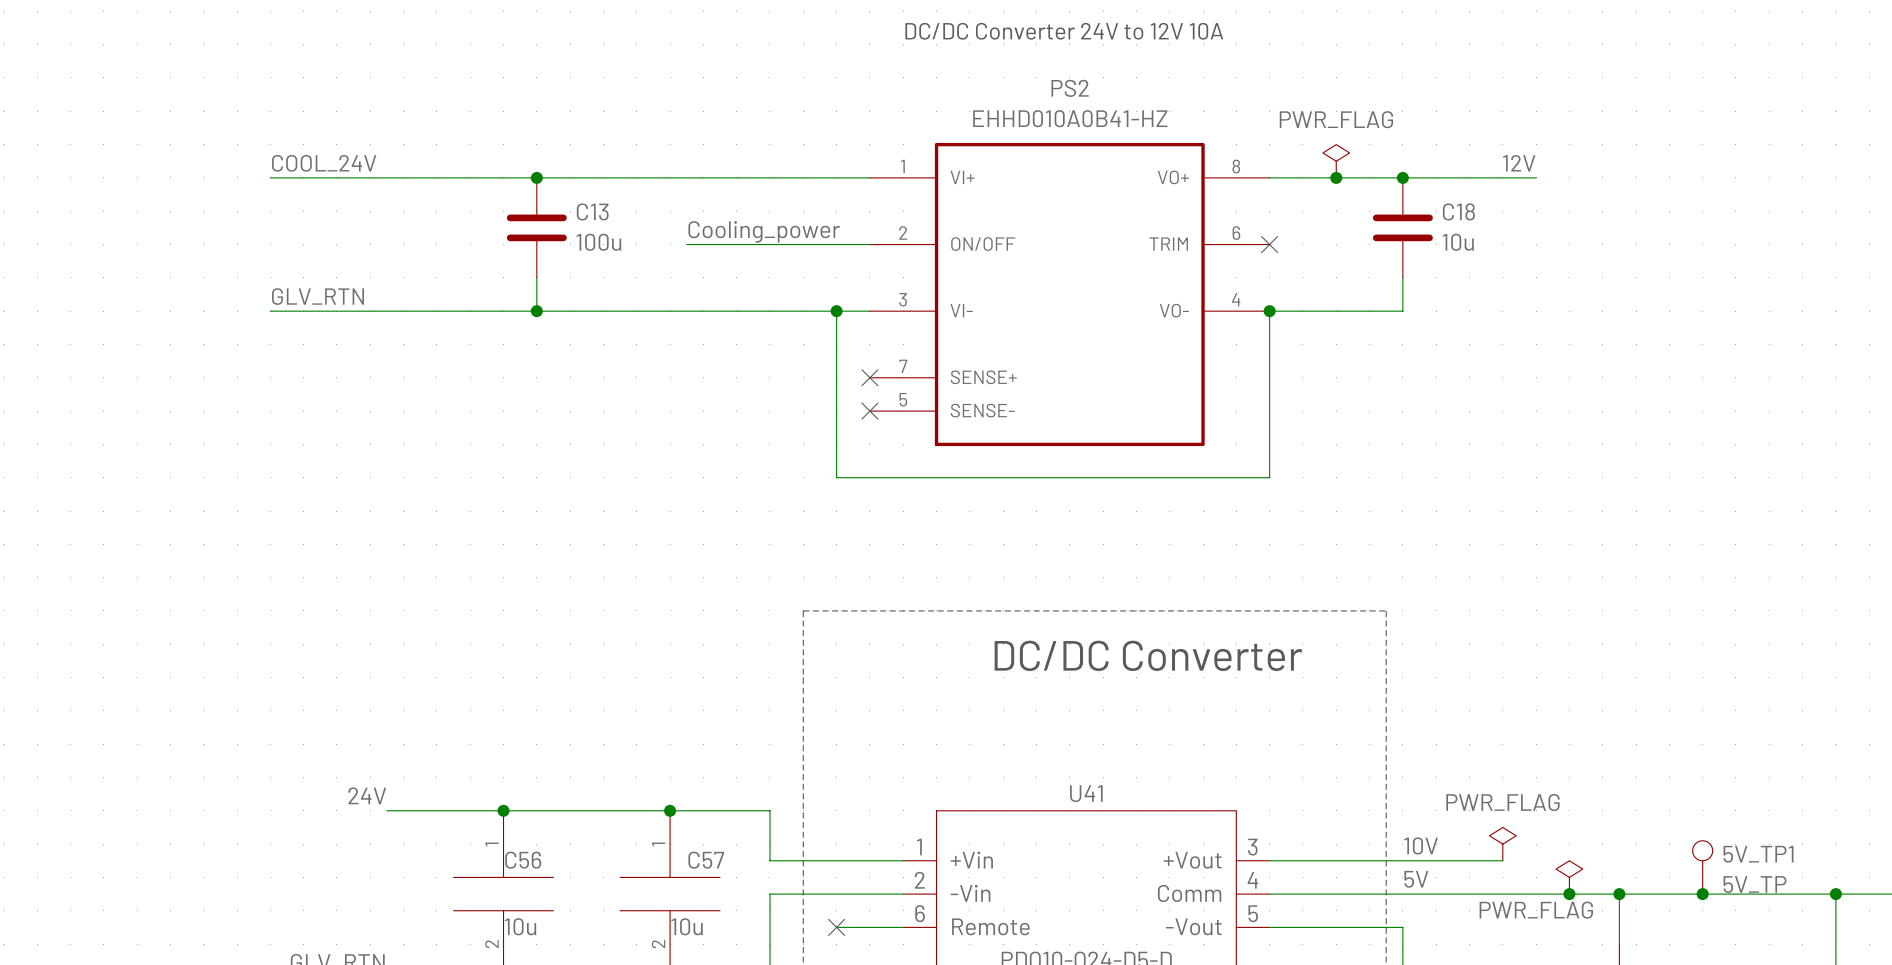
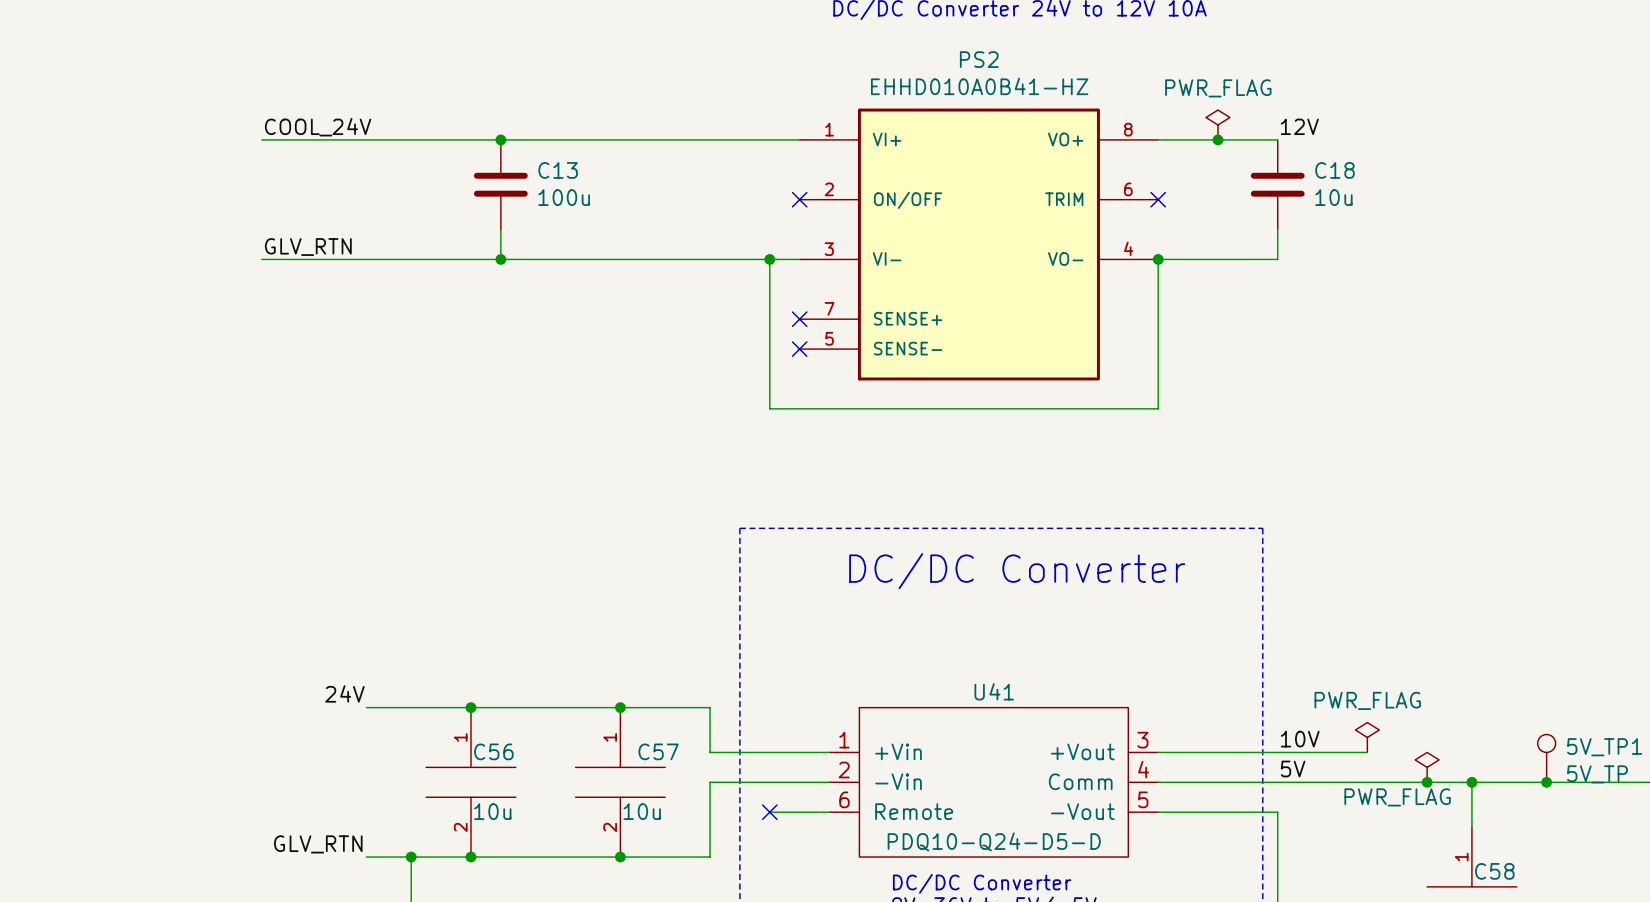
label position: 12V (1519, 163) -> 12V (1299, 126)
wire: (1402, 177) (1536, 177) -> none
junction: (1402, 177) -> none
label: Cooling_power (764, 231) -> none
wire: (686, 244) (869, 244) -> none
no-connect mark: none -> (799, 199)

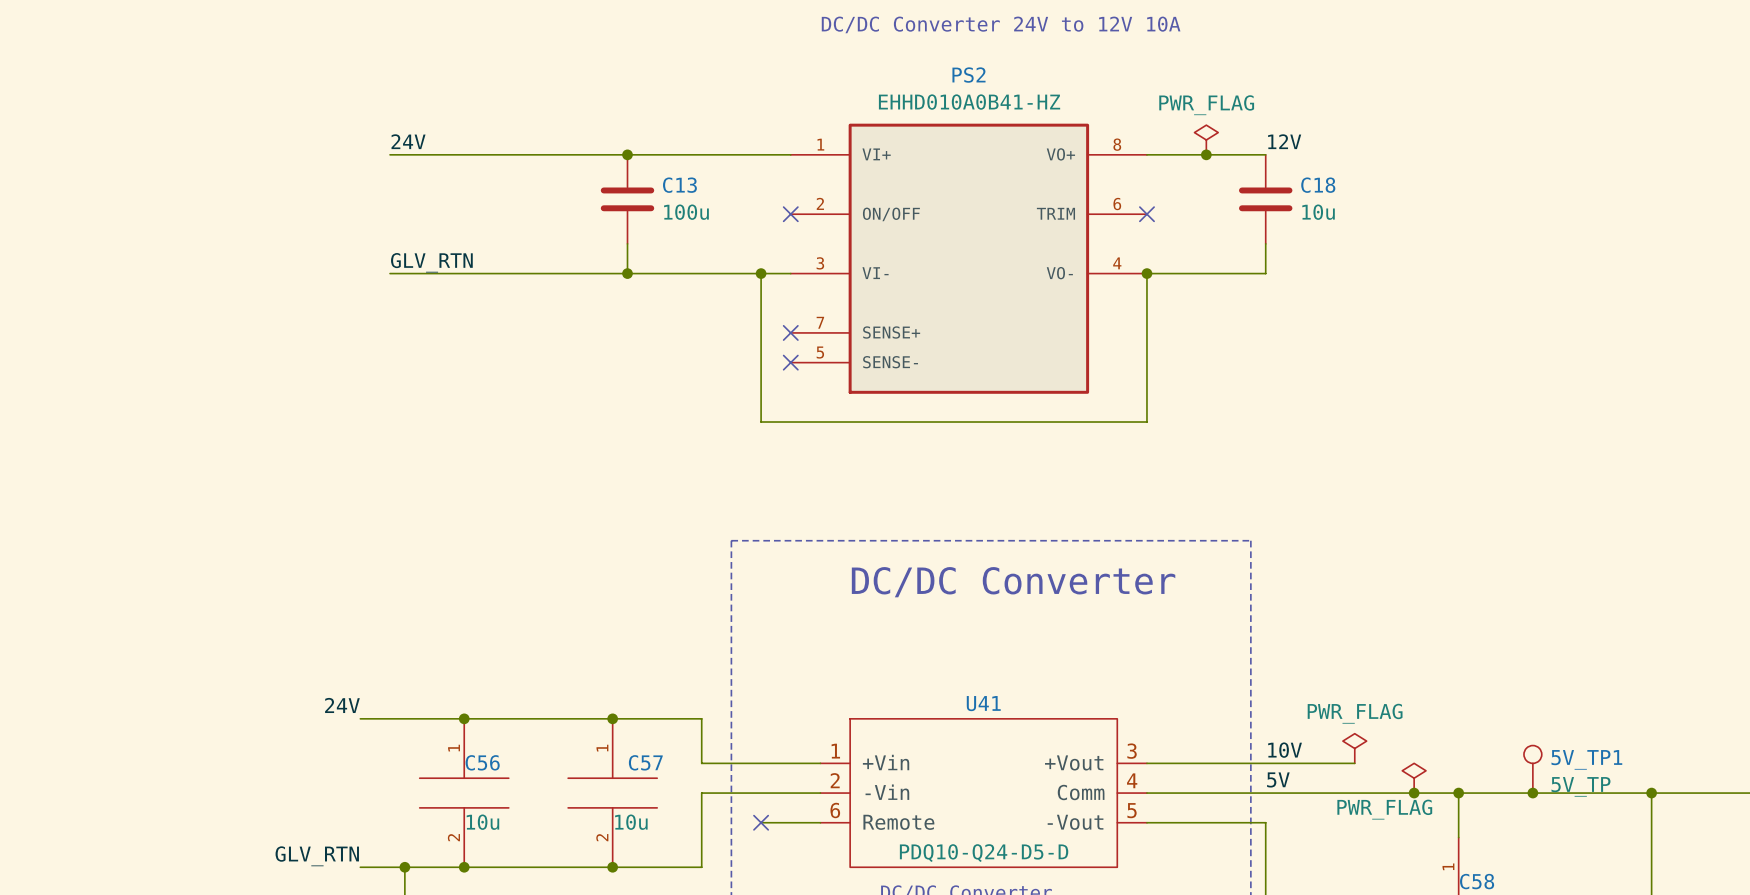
label: none -> 24V (408, 141)
label: COOL_24V (318, 127) -> none
wire: (261, 139) (396, 139) -> none
junction: (500, 139) -> none
junction: none -> (627, 154)
C13 position: (500, 184) -> (627, 199)
wire: (500, 229) (500, 259) -> (627, 243) (627, 273)
label position: GLV_RTN (308, 247) -> GLV_RTN (431, 262)
wire: (261, 259) (396, 259) -> none
junction: (500, 259) -> none
junction: none -> (627, 273)

